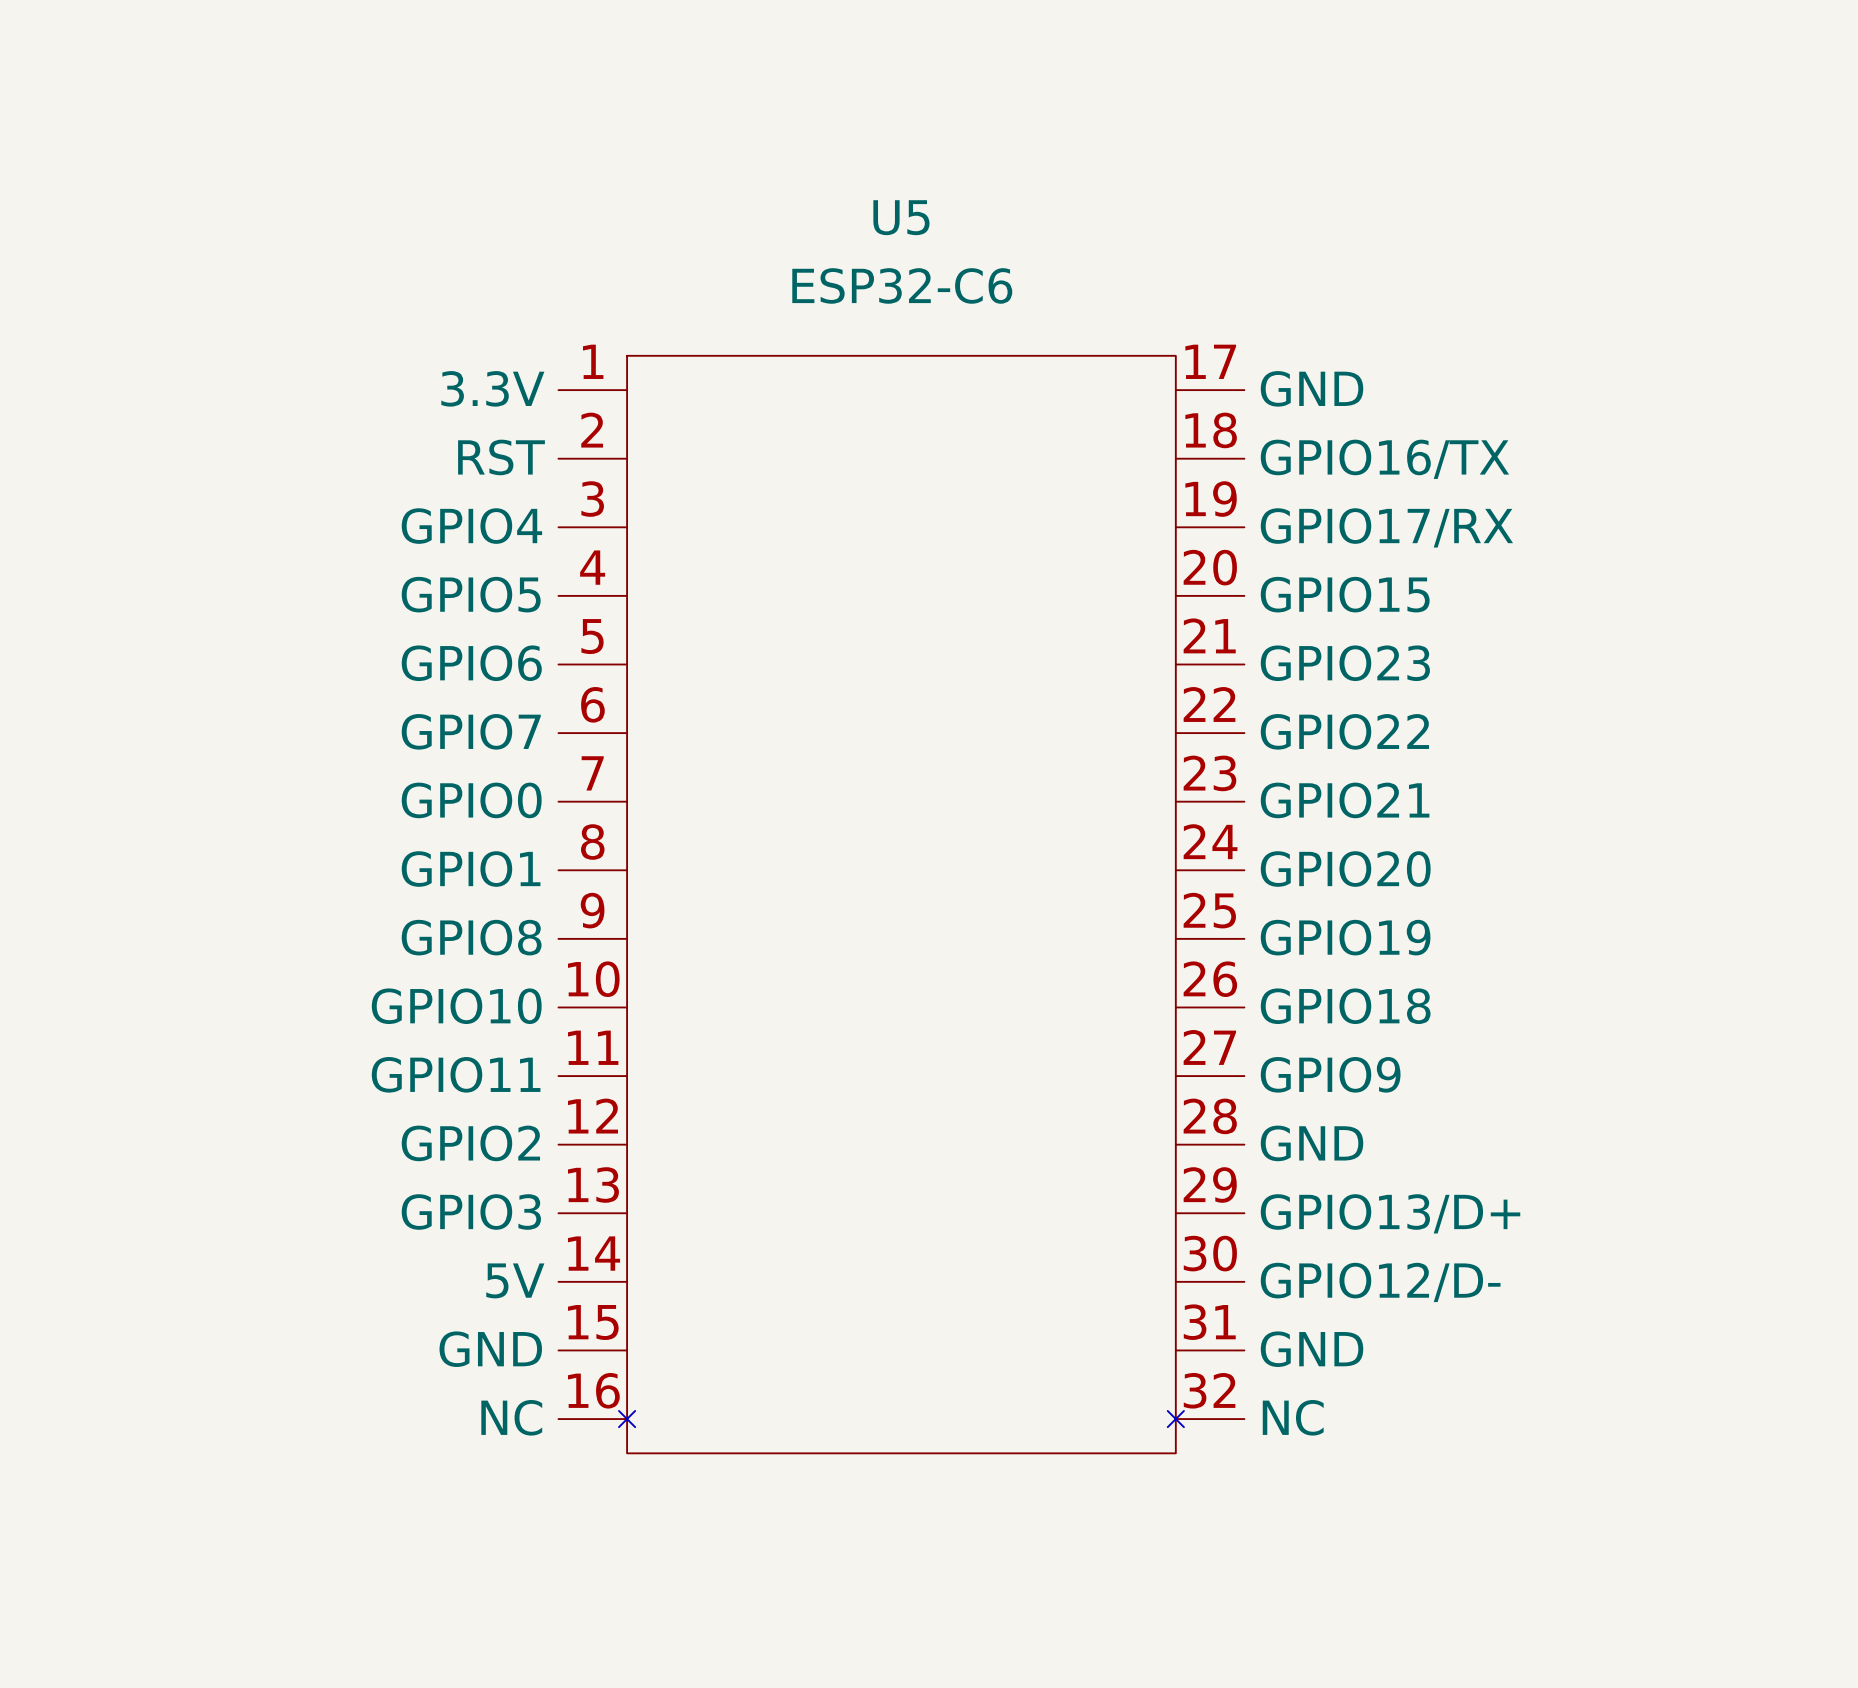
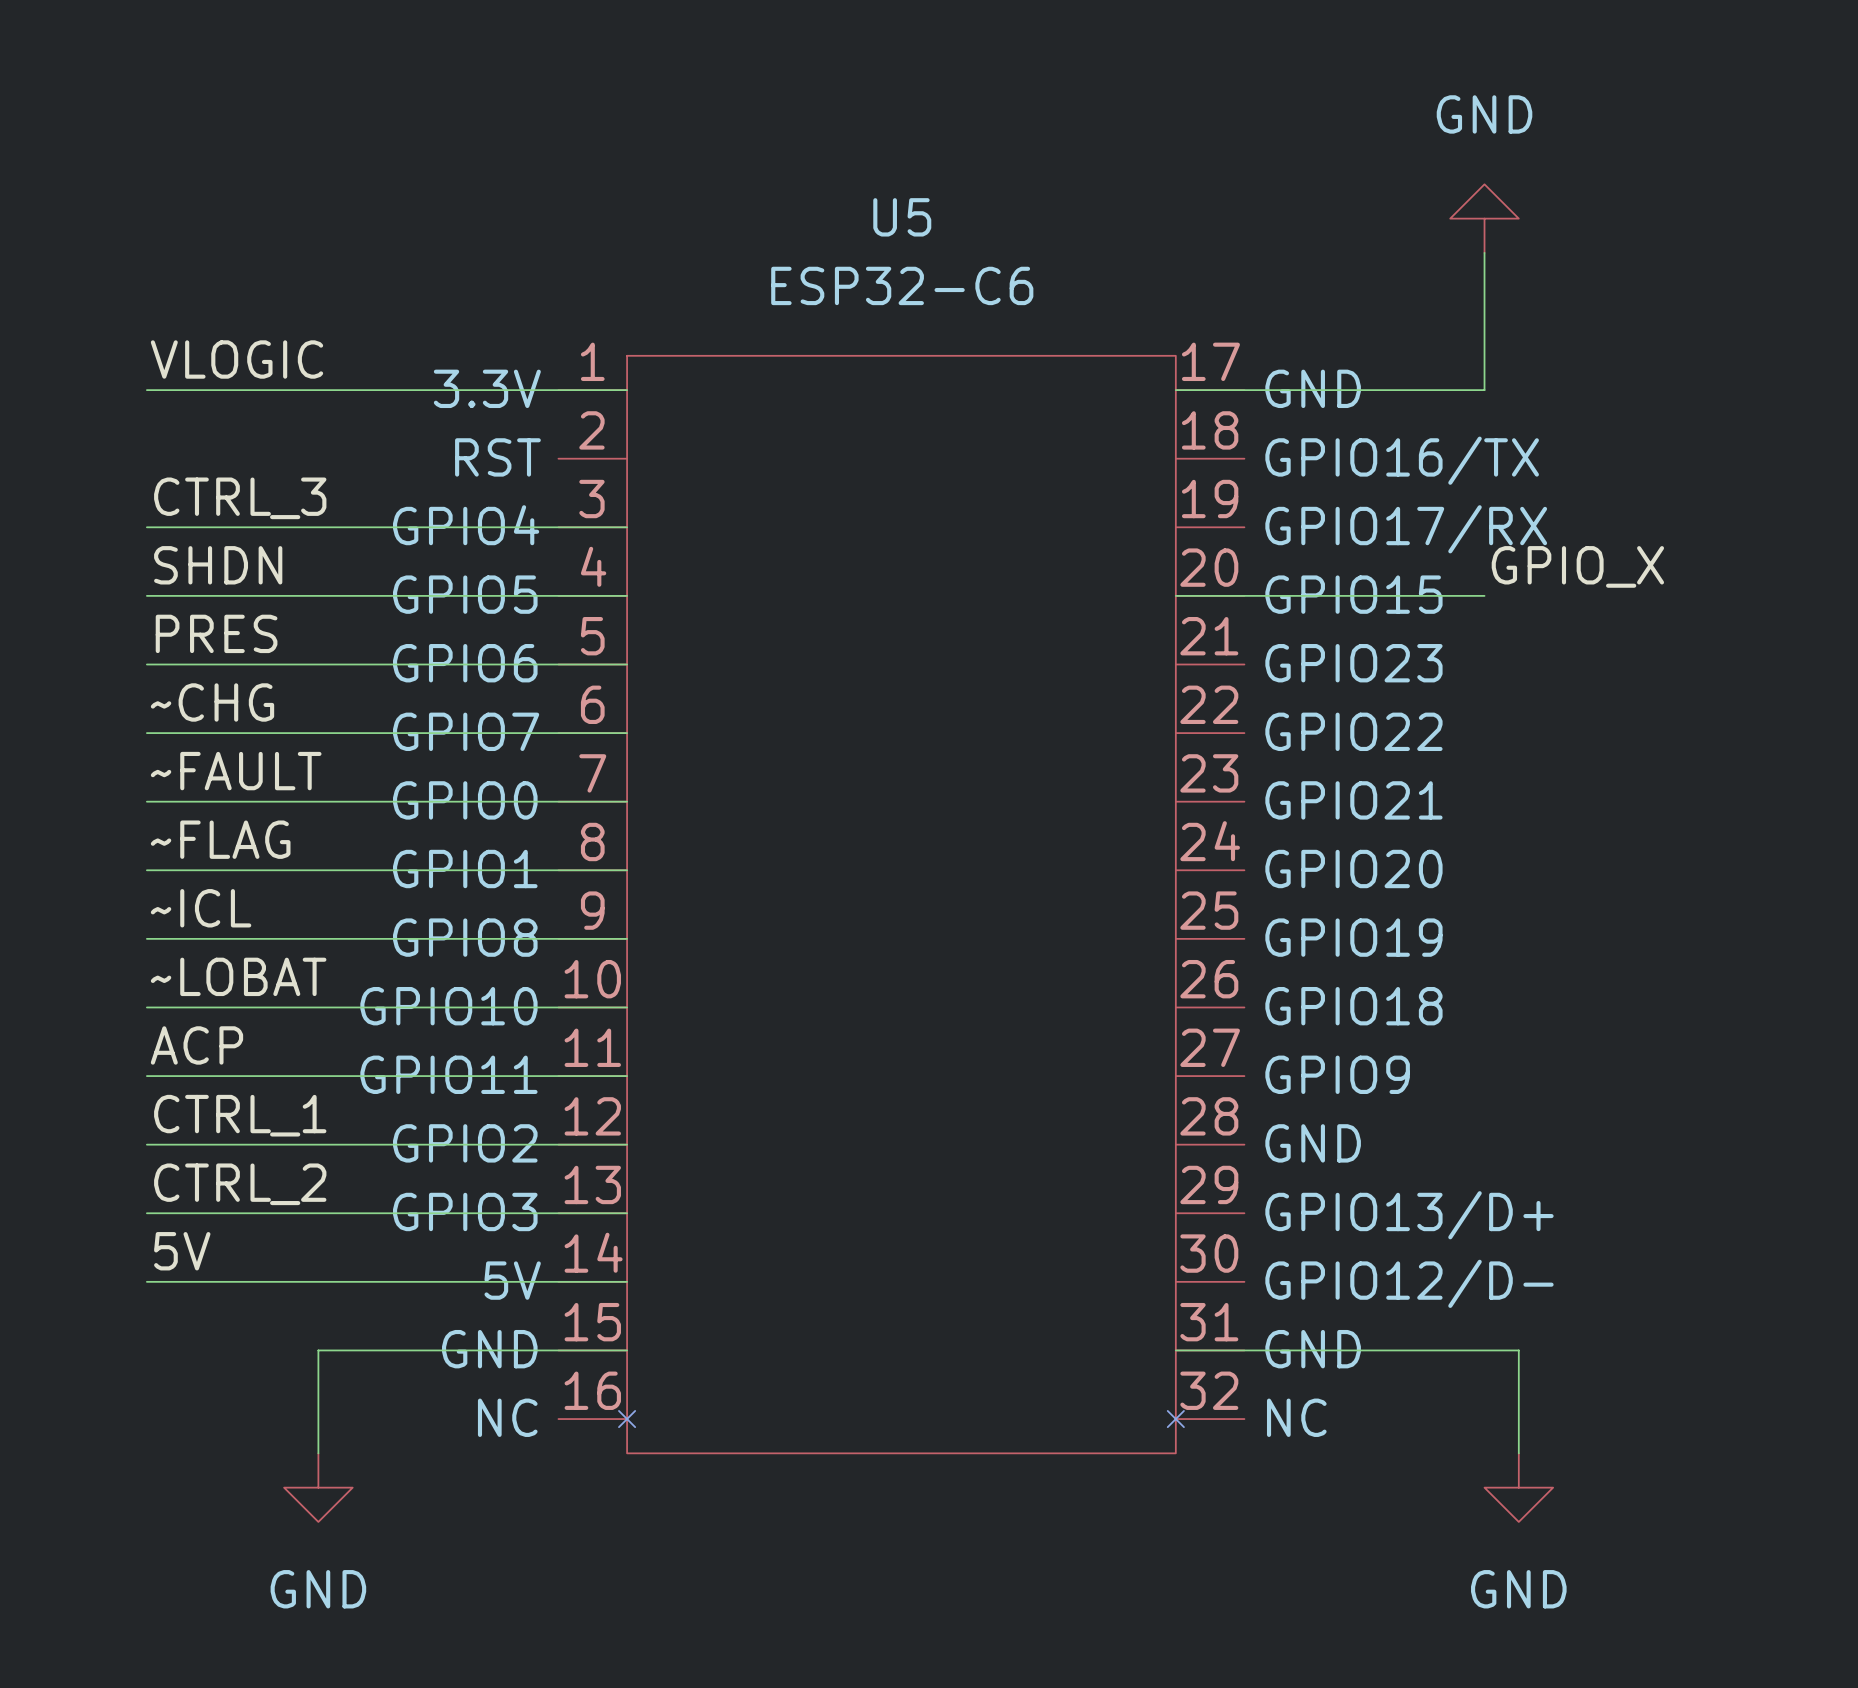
power symbol: none -> GND (1484, 218)
wire: none -> (1484, 252) (1484, 390) (1175, 390)
label: none -> VLOGIC (236, 359)
wire: none -> (146, 390) (627, 390)
label: none -> CTRL_3 (240, 498)
wire: none -> (146, 527) (627, 527)
label: none -> SHDN (218, 565)
label: none -> GPIO_X (1577, 566)
wire: none -> (146, 595) (627, 595)
wire: none -> (1175, 595) (1484, 595)
label: none -> PRES (216, 633)
wire: none -> (146, 664) (627, 664)
label: none -> ~CHG (212, 702)
wire: none -> (146, 733) (627, 733)
label: none -> ~FAULT (236, 771)
wire: none -> (146, 801) (627, 801)
label: none -> ~FLAG (220, 839)
wire: none -> (146, 870) (627, 870)
label: none -> ~ICL (201, 908)
wire: none -> (146, 938) (627, 938)
label: none -> ~LOBAT (238, 976)
wire: none -> (146, 1007) (627, 1007)
label: none -> ACP (196, 1045)
wire: none -> (146, 1076) (627, 1076)
label: none -> CTRL_1 (240, 1115)
wire: none -> (146, 1144) (627, 1144)
label: none -> CTRL_2 (240, 1184)
wire: none -> (146, 1213) (627, 1213)
label: none -> 5V (182, 1251)
wire: none -> (146, 1281) (627, 1281)
wire: none -> (627, 1350) (318, 1350) (318, 1453)
wire: none -> (1175, 1350) (1518, 1350) (1518, 1453)
power symbol: none -> GND (318, 1487)
power symbol: none -> GND (1518, 1487)

